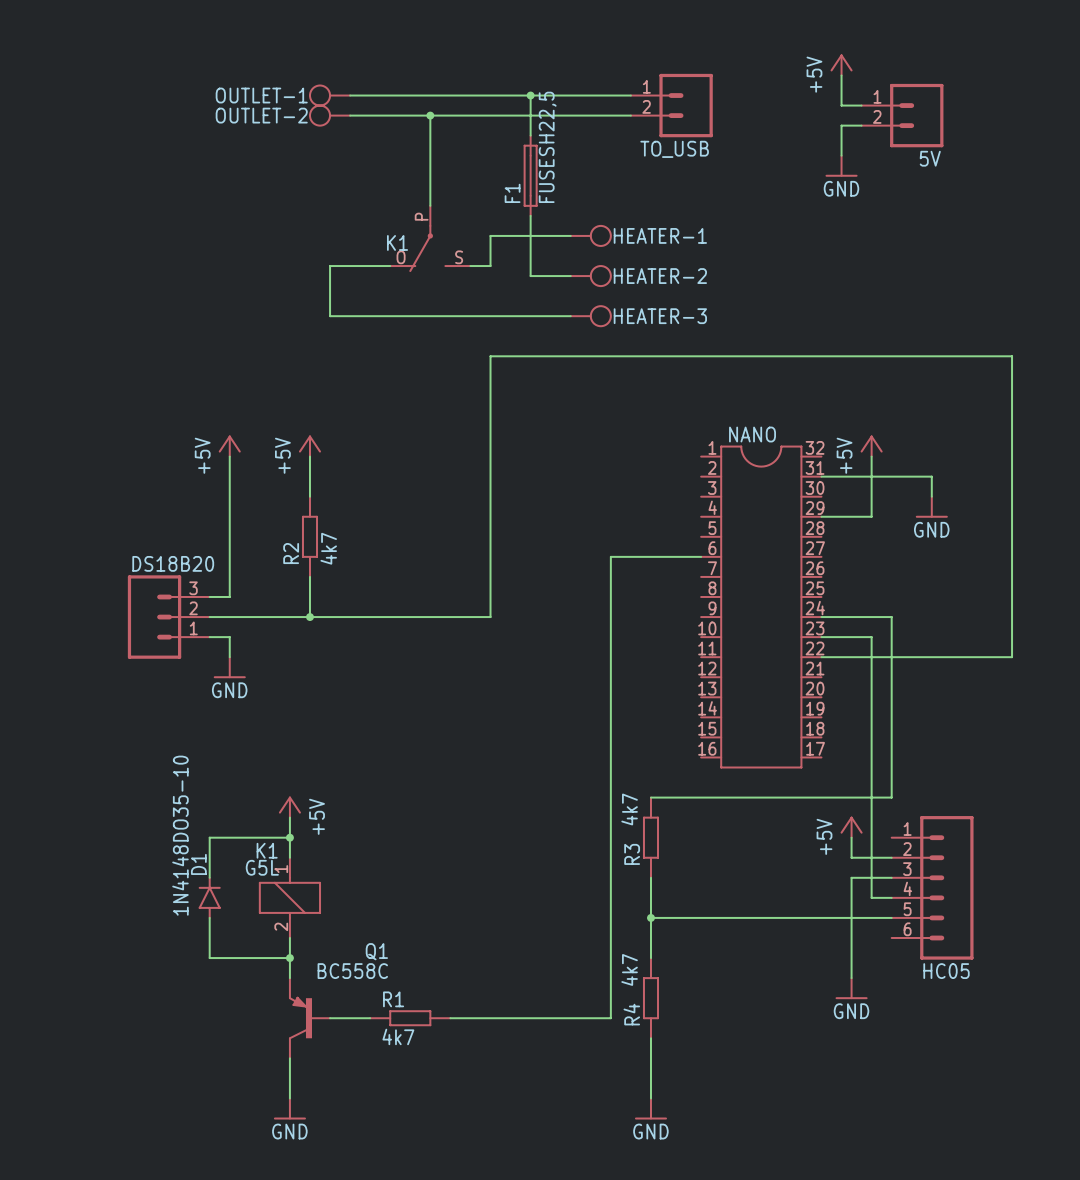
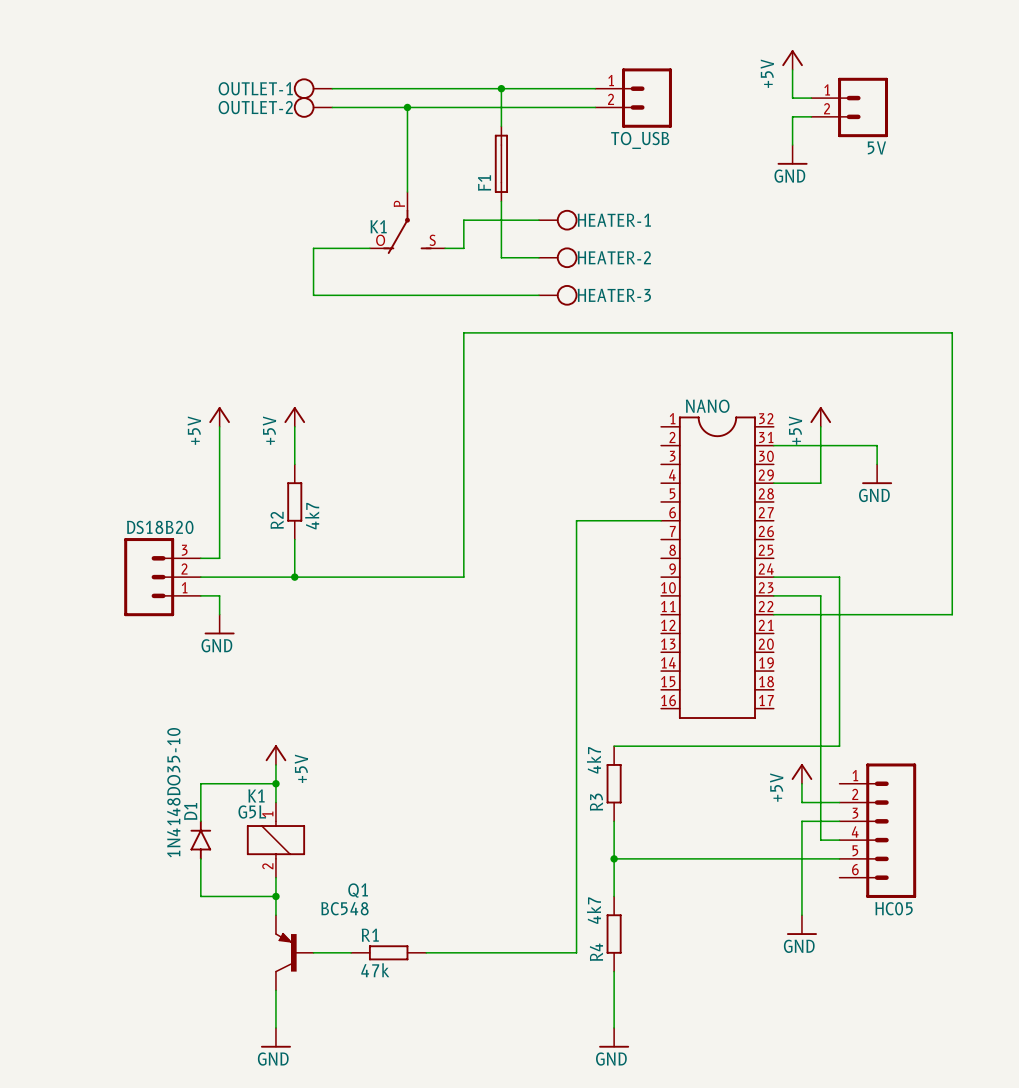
F1 value: FUSESH22,5 (547, 147) -> none
Q1 value: BC558C (352, 971) -> BC548 (344, 908)
R1 value: 4k7 (398, 1036) -> 47k (375, 970)

